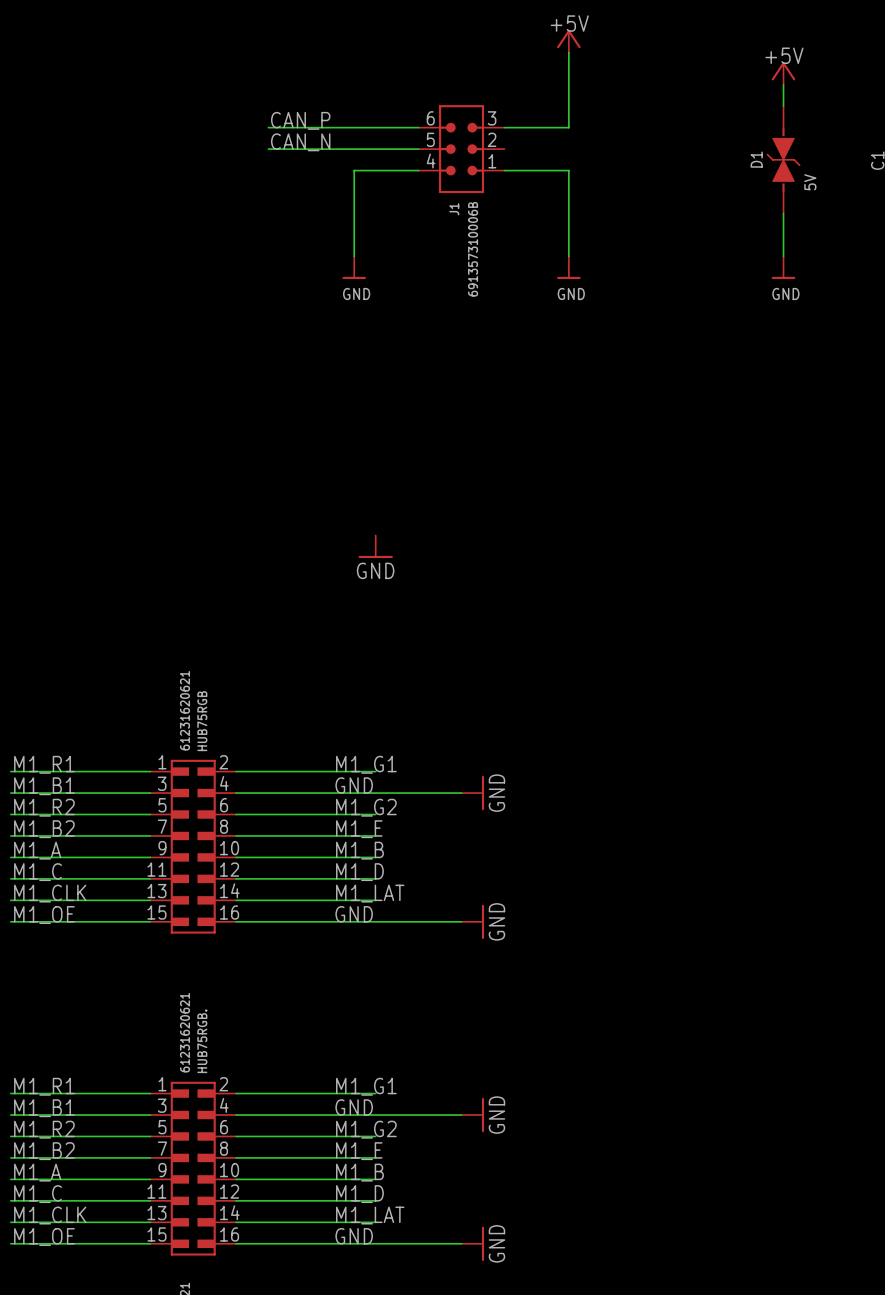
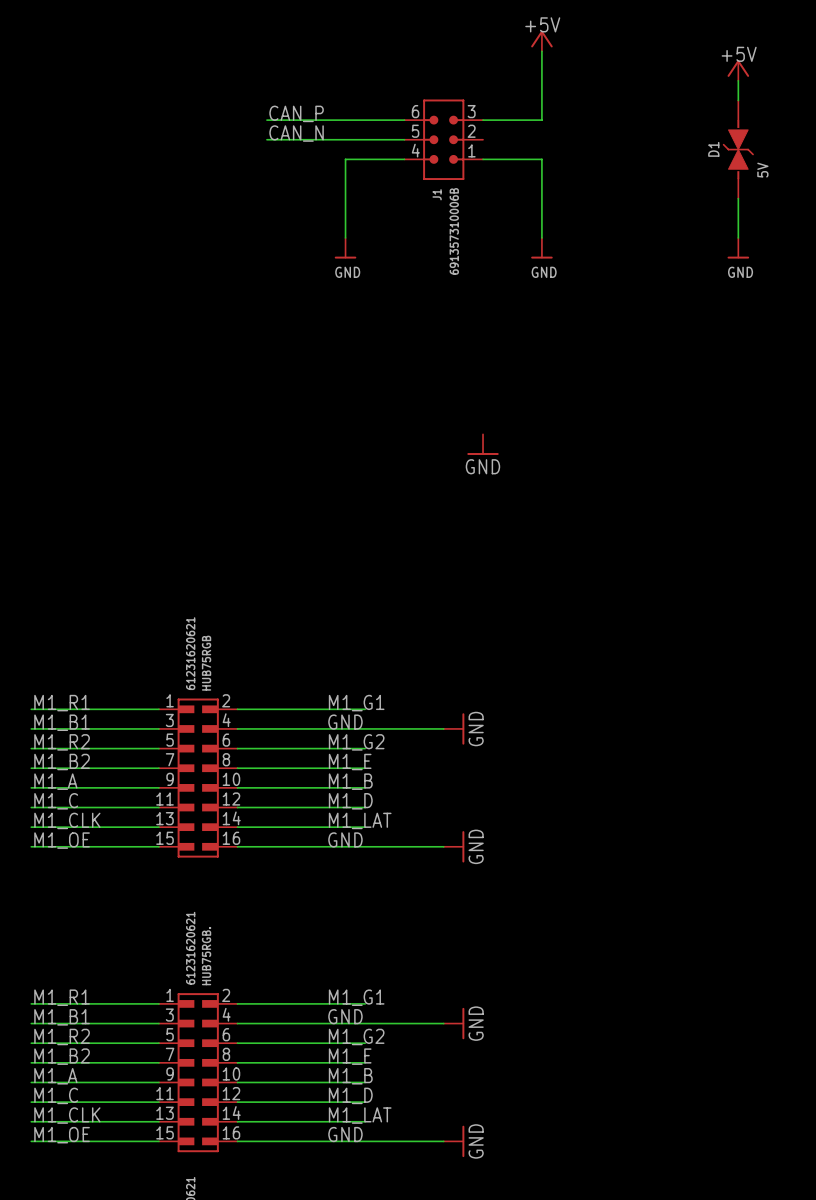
power symbol position: GND (375, 546) -> GND (483, 444)

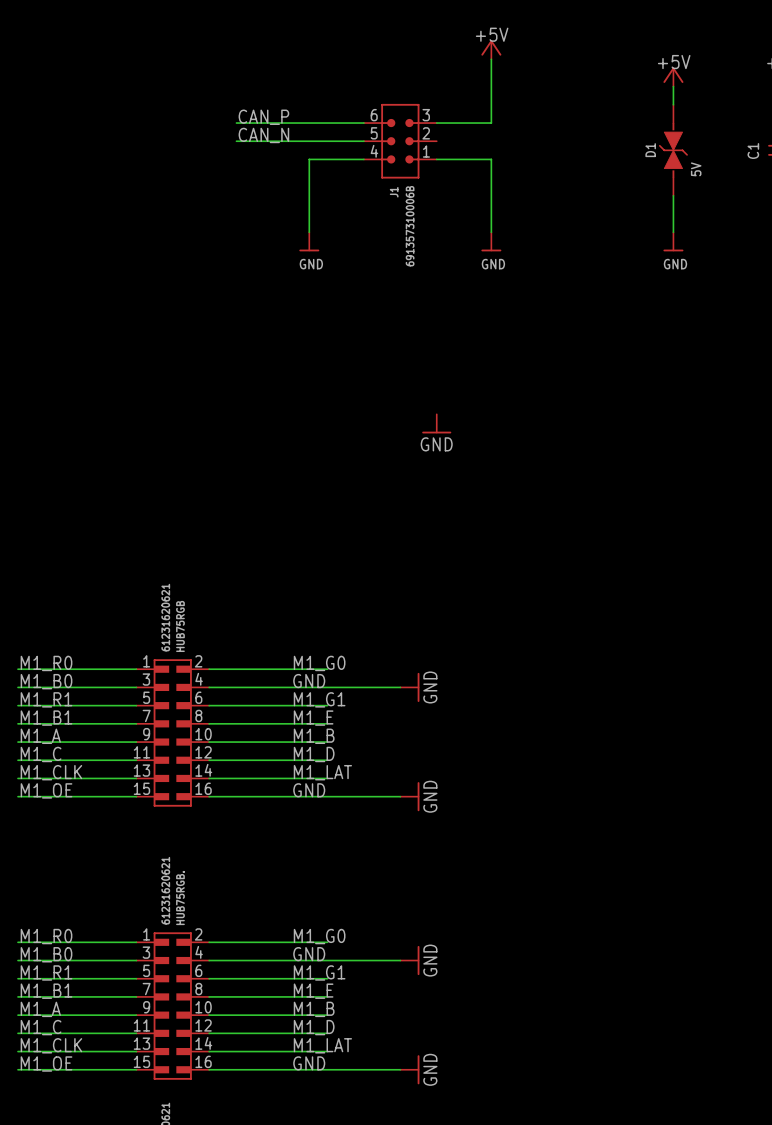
label: M1_R1 (62, 703) -> M1_R0 (46, 663)
label: M1_G1 (356, 703) -> M1_G0 (319, 663)
label: M1_B1 (62, 722) -> M1_B0 (46, 681)
label: M1_R2 (62, 742) -> M1_R1 (46, 699)
label: M1_G2 (356, 742) -> M1_G1 (319, 699)
label: M1_B2 (62, 762) -> M1_B1 (46, 718)
label: M1_R1 (62, 997) -> M1_R0 (46, 936)
label: M1_G1 (356, 997) -> M1_G0 (319, 936)
label: M1_B1 (62, 1017) -> M1_B0 (46, 954)
label: M1_R2 (62, 1036) -> M1_R1 (46, 972)
label: M1_G2 (356, 1036) -> M1_G1 (319, 972)
label: M1_B2 (62, 1056) -> M1_B1 (46, 991)

